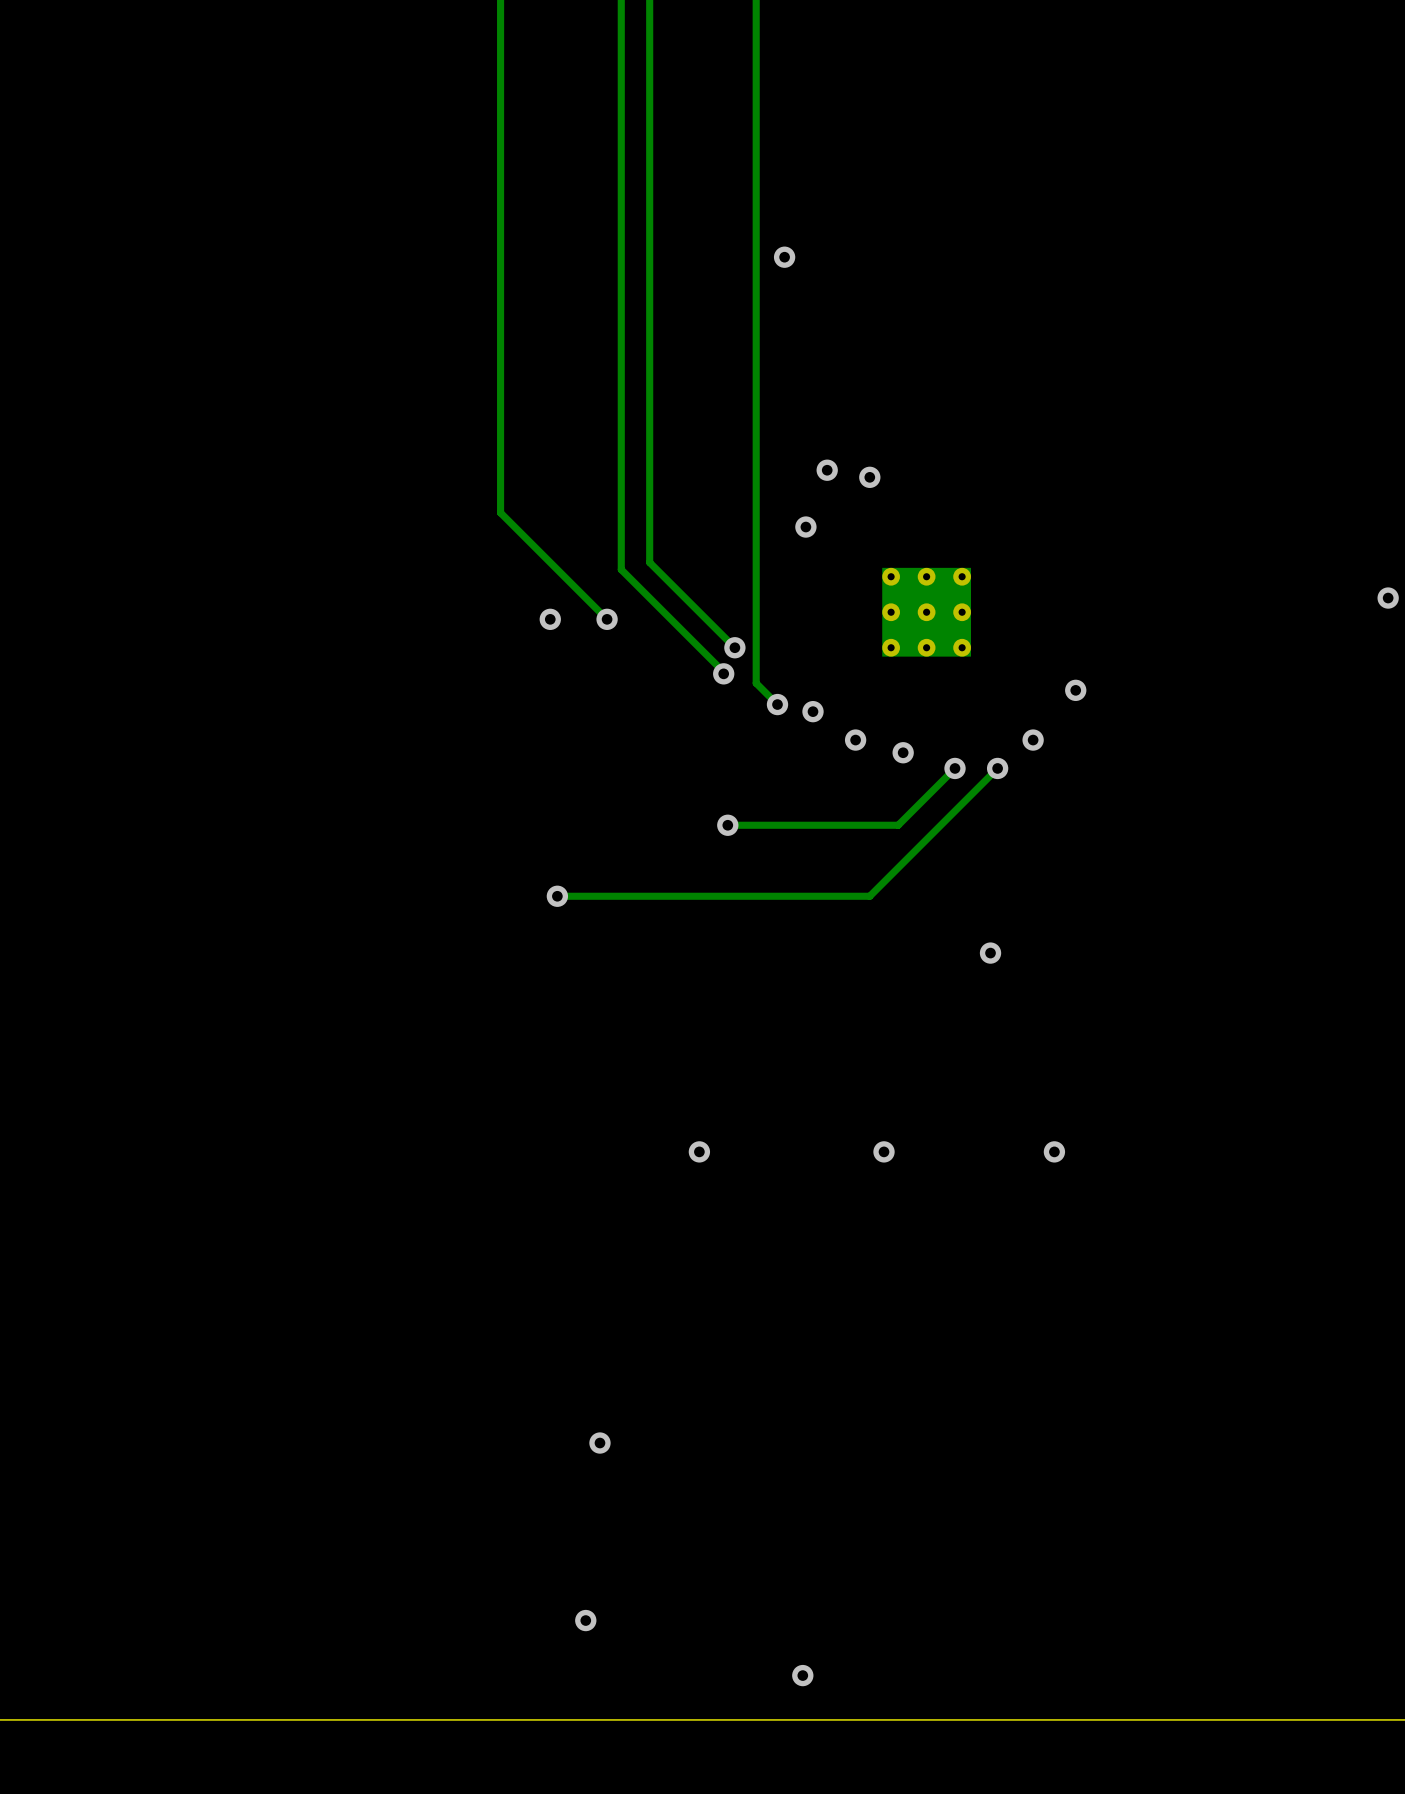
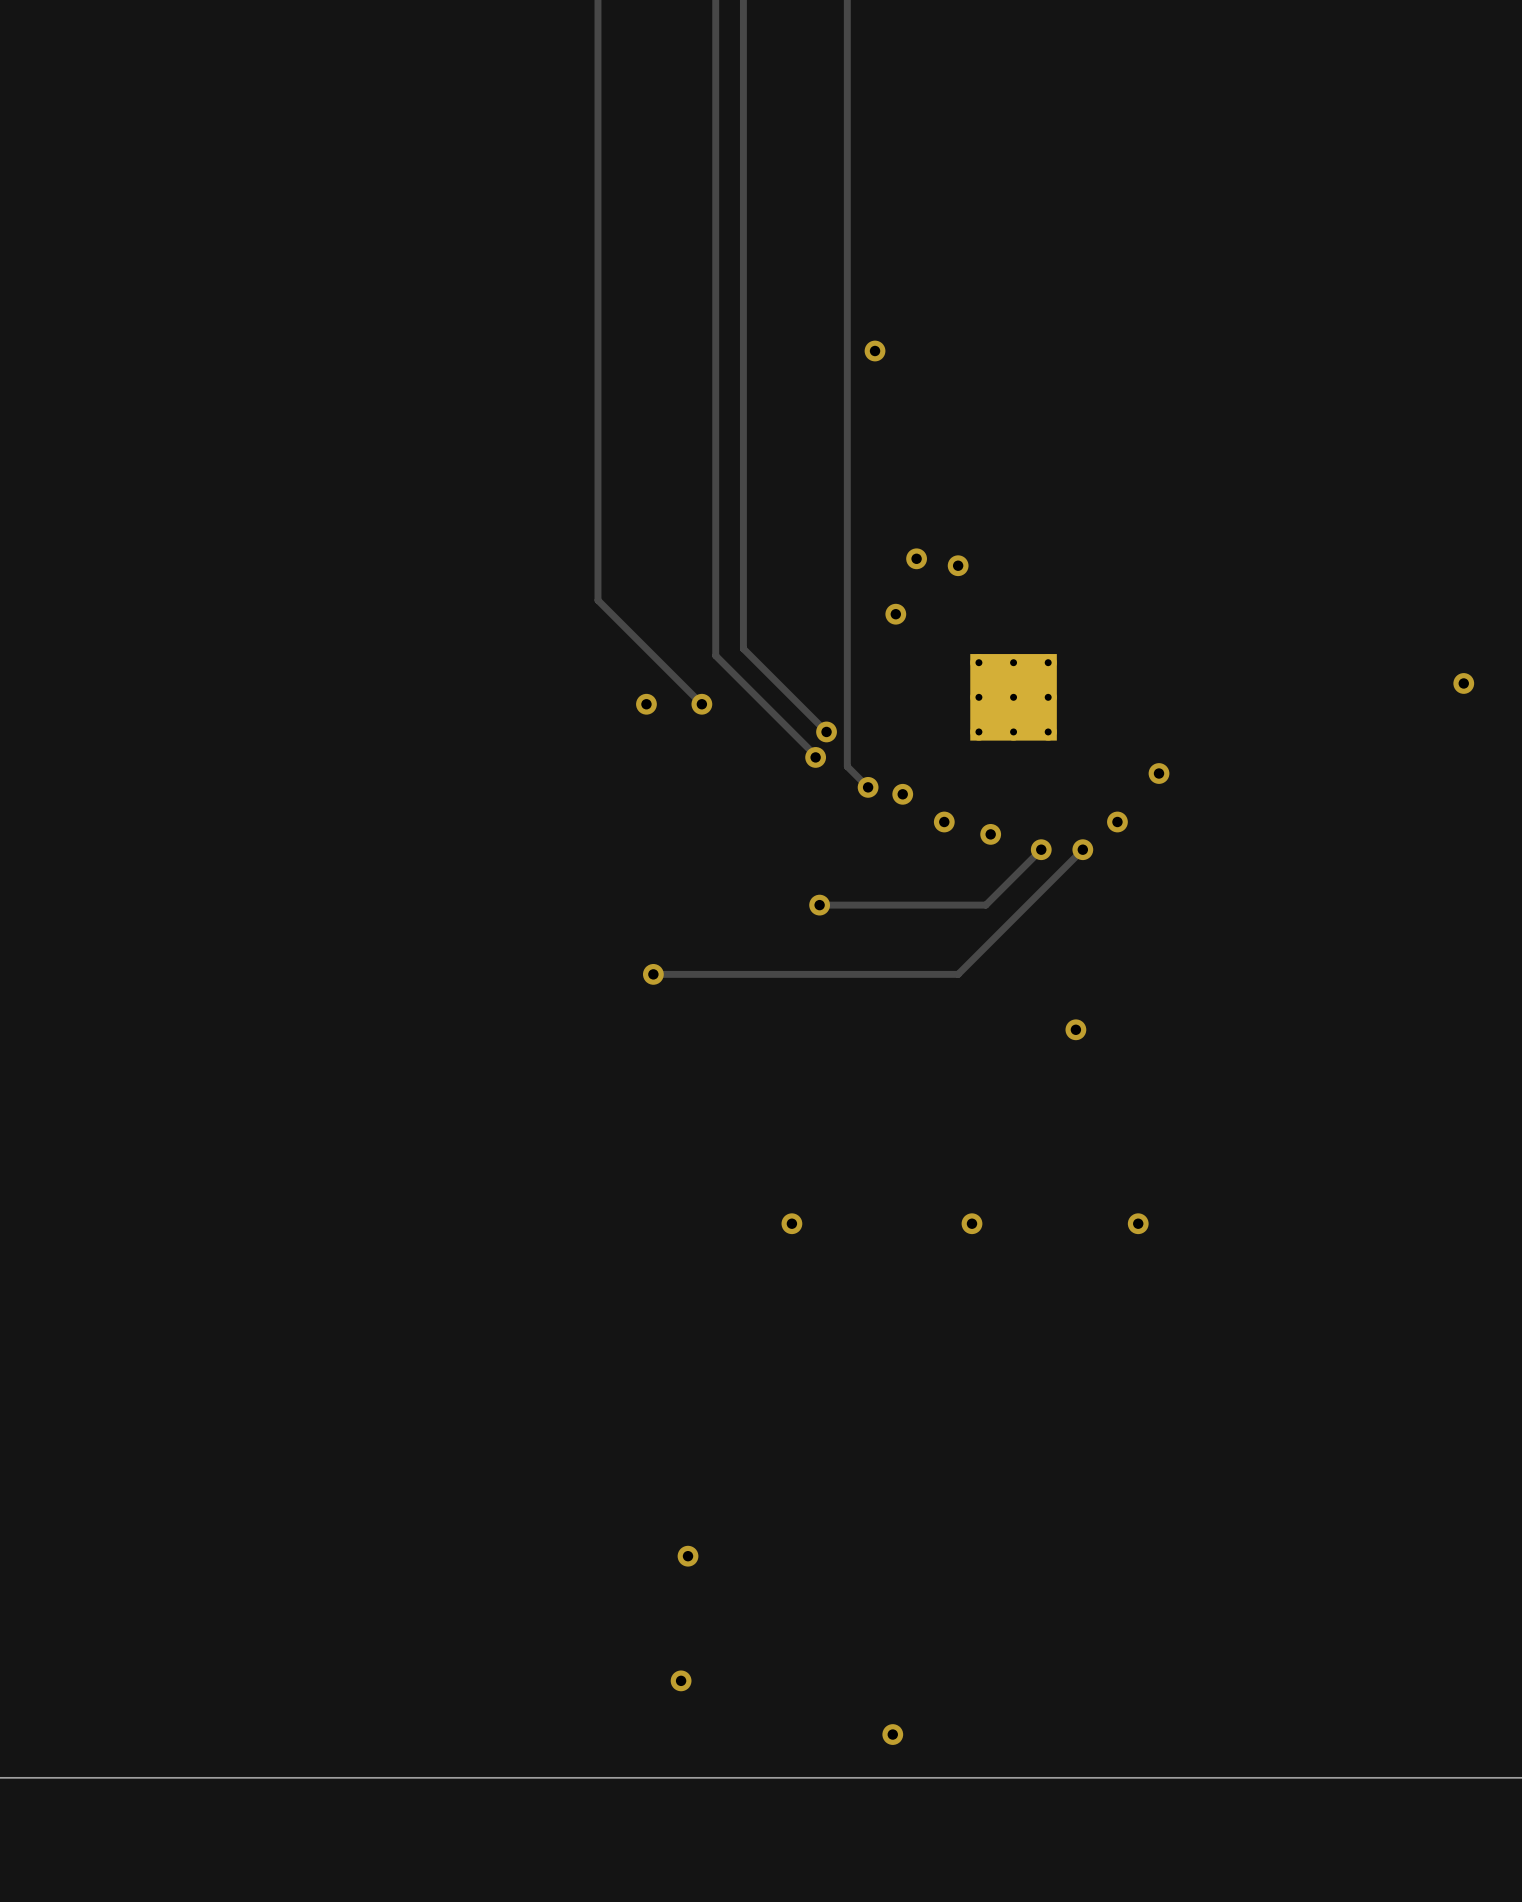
via position: (599, 1443) -> (688, 1556)

